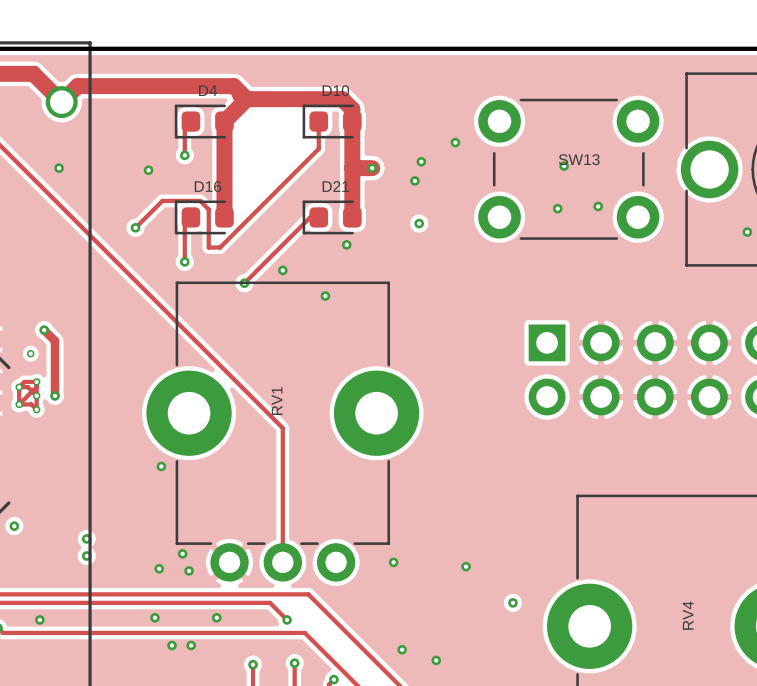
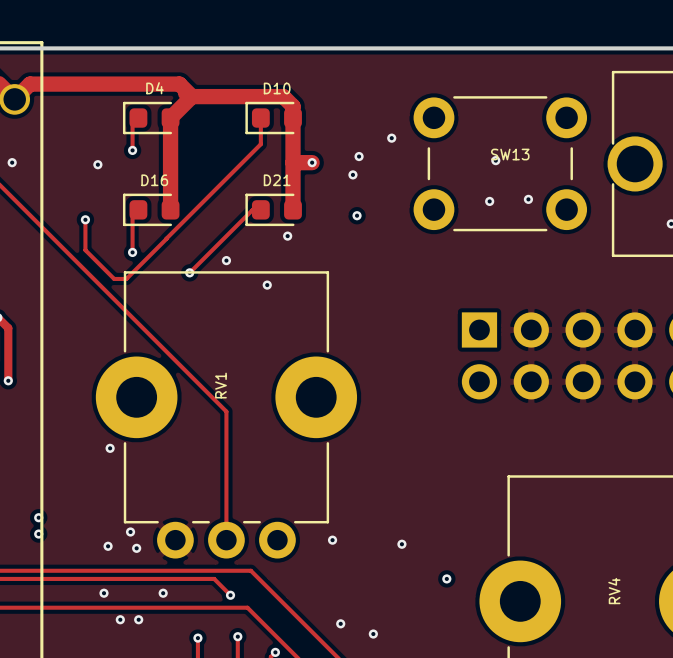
track: (135, 227) (162, 200) (200, 200) (208, 209) (208, 247) (220, 247) -> (85, 219) (85, 250) (114, 278) (126, 278) (166, 238)

